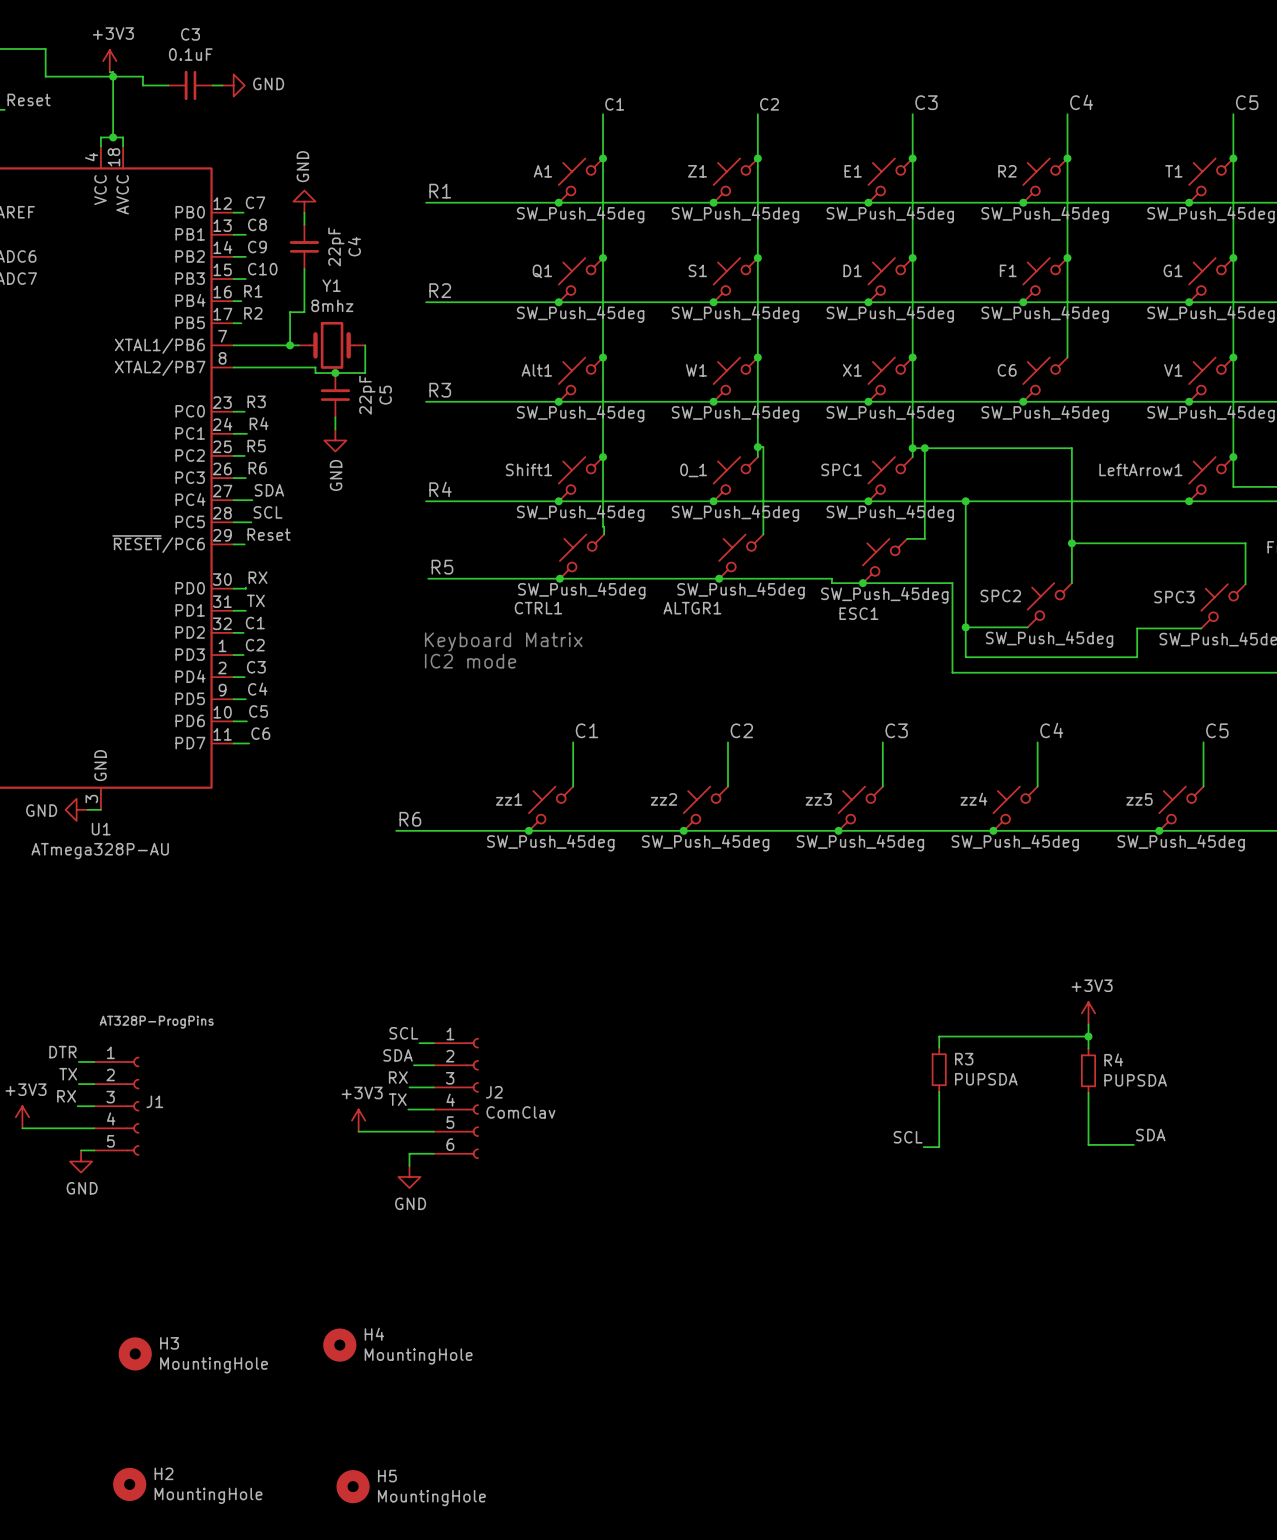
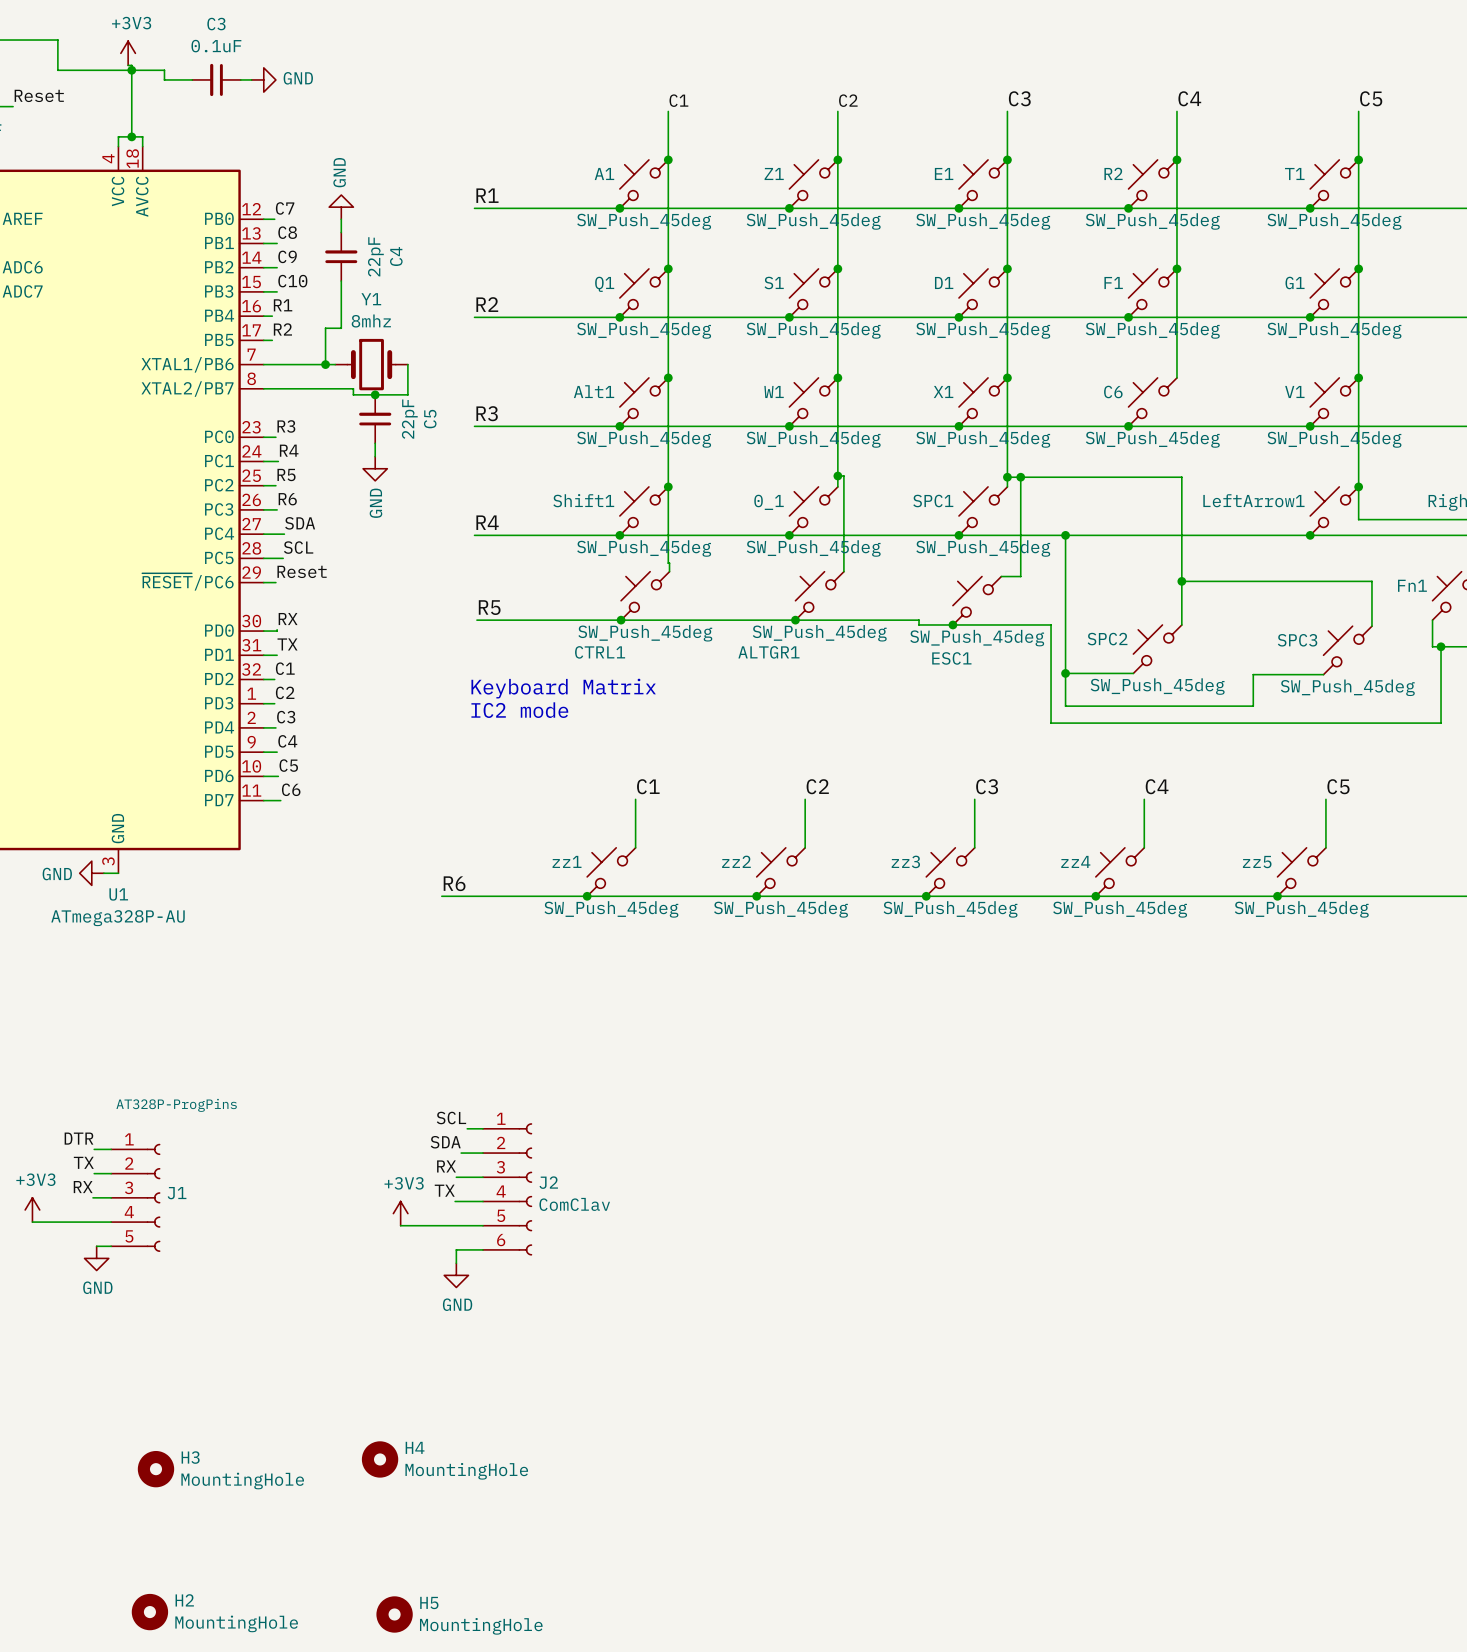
power symbol: +3V3 (1088, 1013) -> none
wire: (1088, 1024) (1088, 1048) -> none
wire: (1088, 1036) (939, 1036) (939, 1047) -> none
junction: (1088, 1036) -> none
R3: PUPSDA (939, 1069) -> none
R4: PUPSDA (1088, 1070) -> none
wire: (939, 1091) (939, 1147) (923, 1147) -> none
wire: (1088, 1092) (1088, 1144) (1133, 1144) -> none
label: SDA (1150, 1135) -> none
label: SCL (908, 1137) -> none

